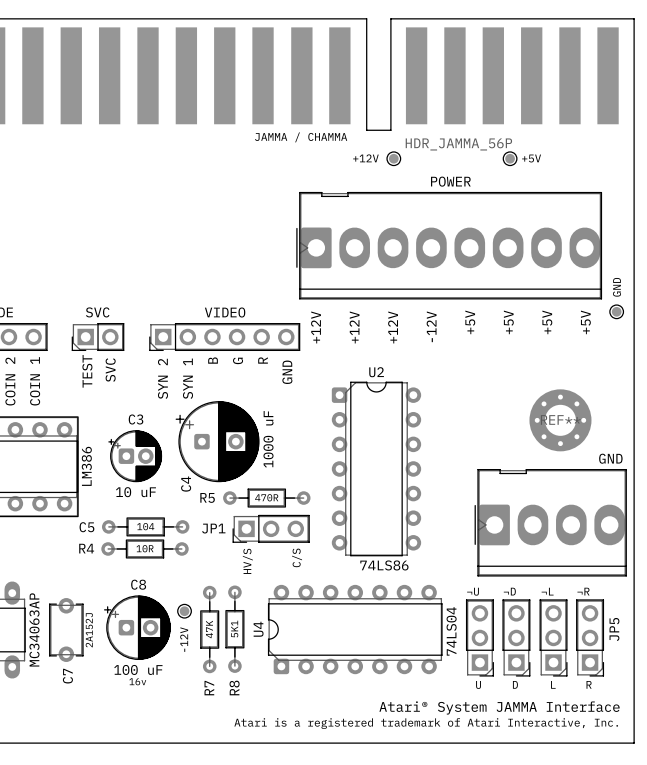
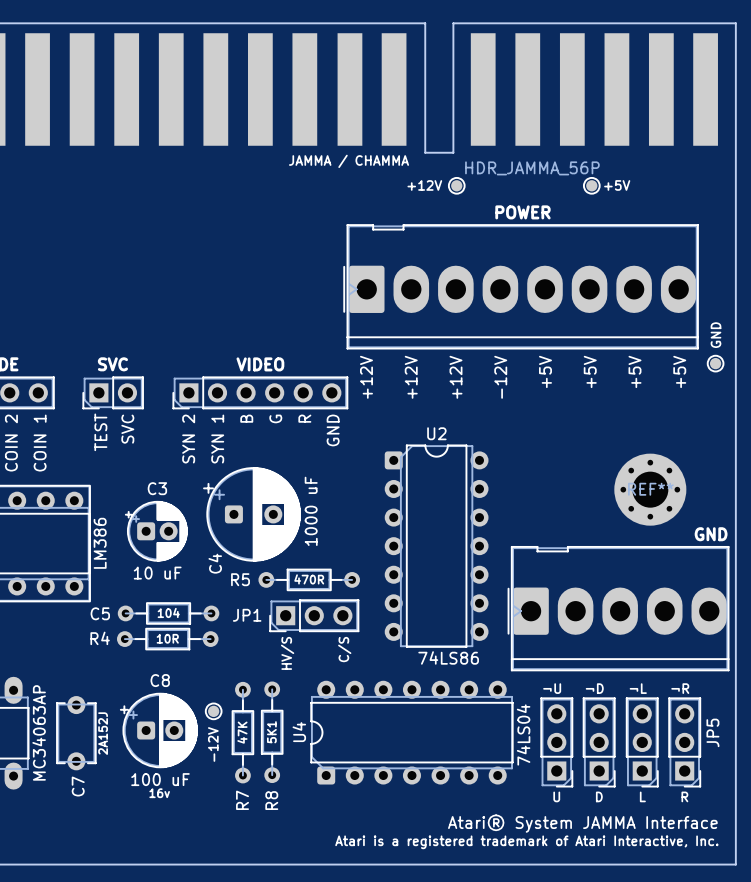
GND: none -> (618, 608)
GND: (550, 522) -> none

